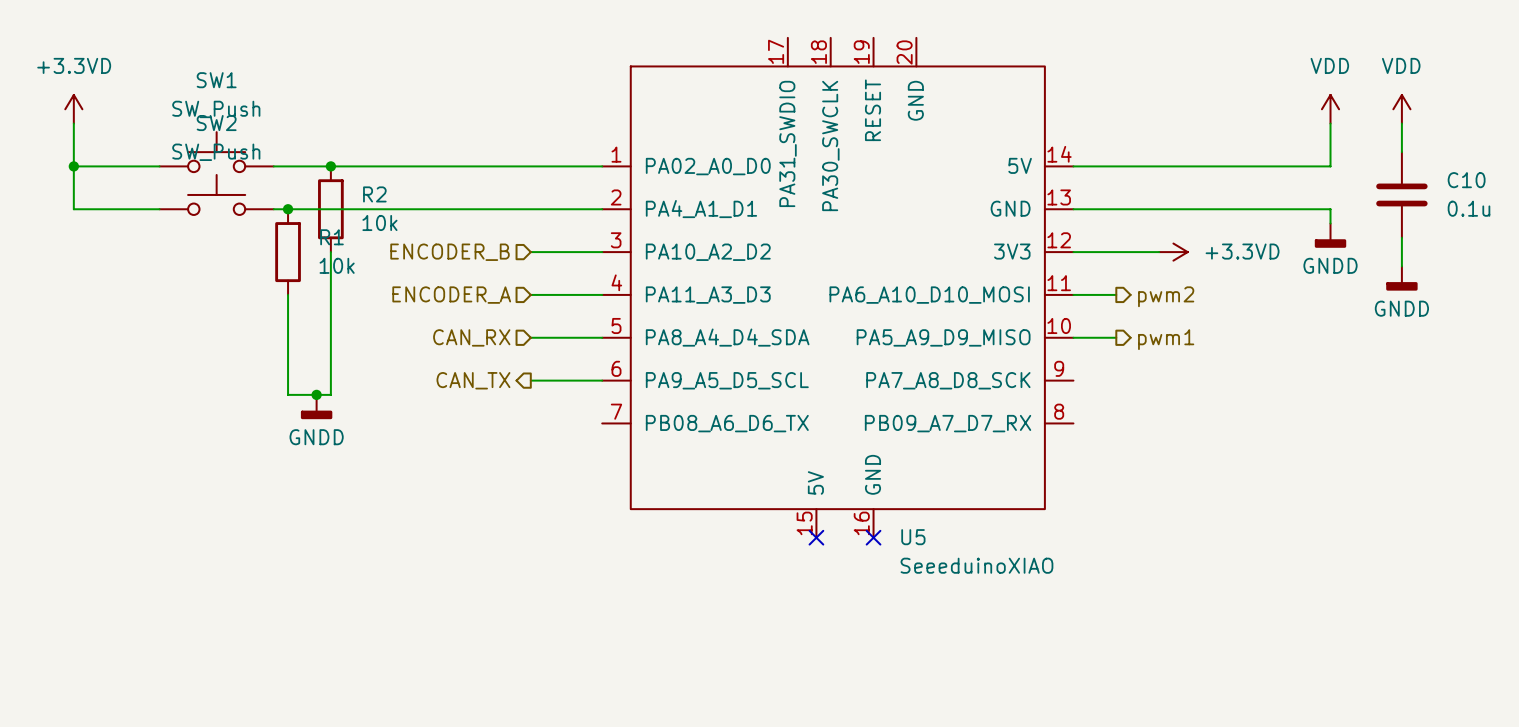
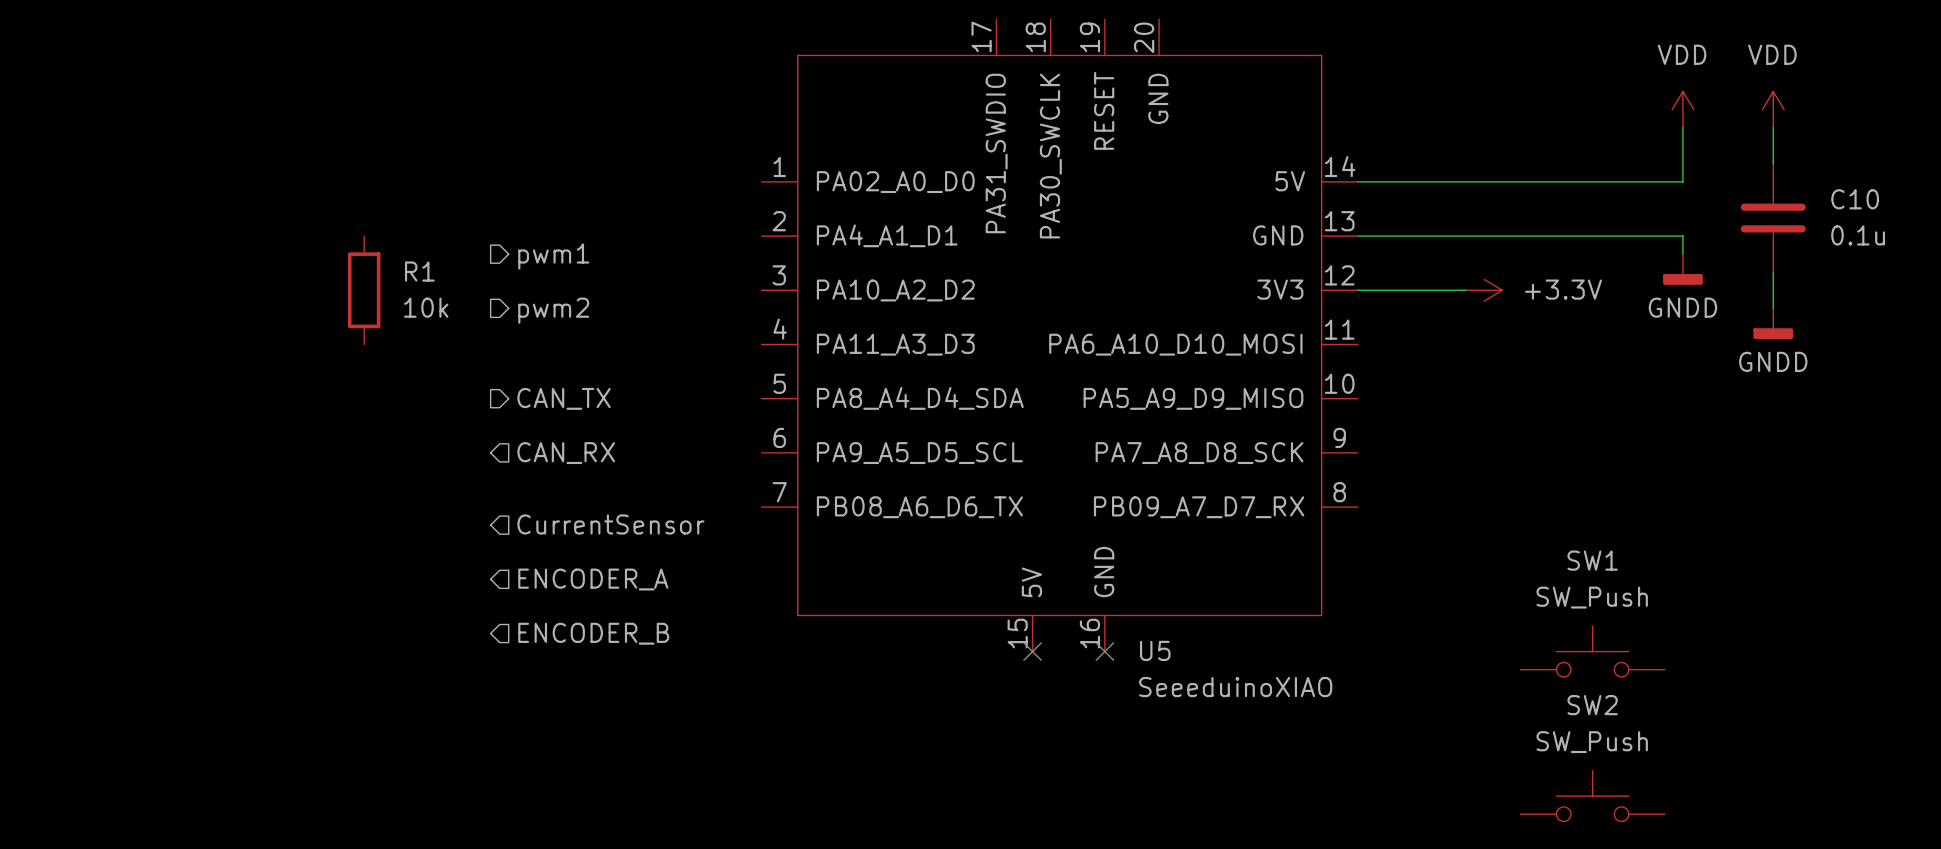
power symbol: +3.3VD (73, 109) -> none
wire: (73, 123) (73, 209) (159, 209) -> none
SW1 position: (216, 152) -> (1592, 651)
wire: (73, 166) (159, 166) -> none
junction: (73, 166) -> none
wire: (273, 166) (602, 166) -> none
junction: (330, 166) -> none
SW2 position: (216, 194) -> (1592, 796)
wire: (273, 209) (602, 209) -> none
junction: (288, 209) -> none
R2: 10k (330, 209) -> none
hierarchical label: none -> pwm1 (553, 256)
wire: (330, 252) (330, 394) (288, 394) (288, 294) -> none
hierarchical label: ENCODER_B (450, 252) -> none
wire: (530, 252) (602, 252) -> none
power symbol: +3.3VD (1173, 252) -> +3.3V (1484, 290)
hierarchical label: none -> pwm2 (553, 310)
wire: (530, 294) (602, 294) -> none
wire: (1073, 294) (1116, 294) -> none
hierarchical label rotation: 0° (451, 295) -> 180° (593, 579)
hierarchical label position: ENCODER_A (451, 295) -> ENCODER_A (593, 579)
hierarchical label: pwm2 (1166, 296) -> none
hierarchical label rotation: 0° (471, 337) -> 180° (566, 453)
wire: (530, 337) (602, 337) -> none
wire: (1073, 337) (1116, 337) -> none
hierarchical label: pwm1 (1166, 339) -> none
hierarchical label rotation: 0° (473, 380) -> 180° (564, 398)
wire: (530, 380) (602, 380) -> none
junction: (316, 394) -> none
power symbol: GNDD (316, 407) -> none
hierarchical label: none -> CurrentSensor (610, 524)
hierarchical label: none -> ENCODER_B (593, 633)

